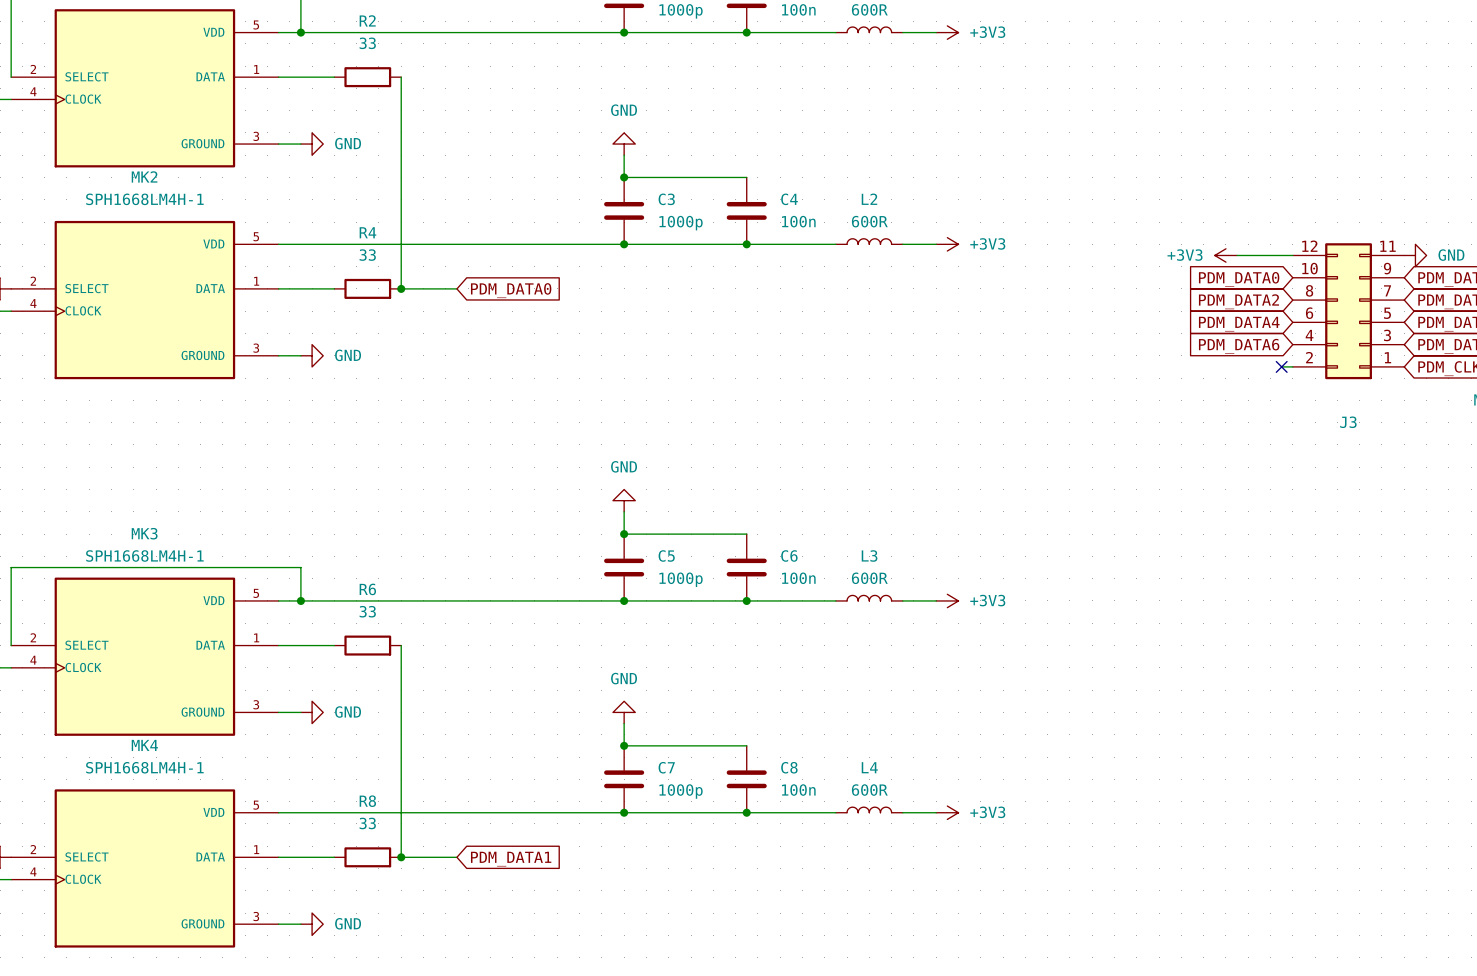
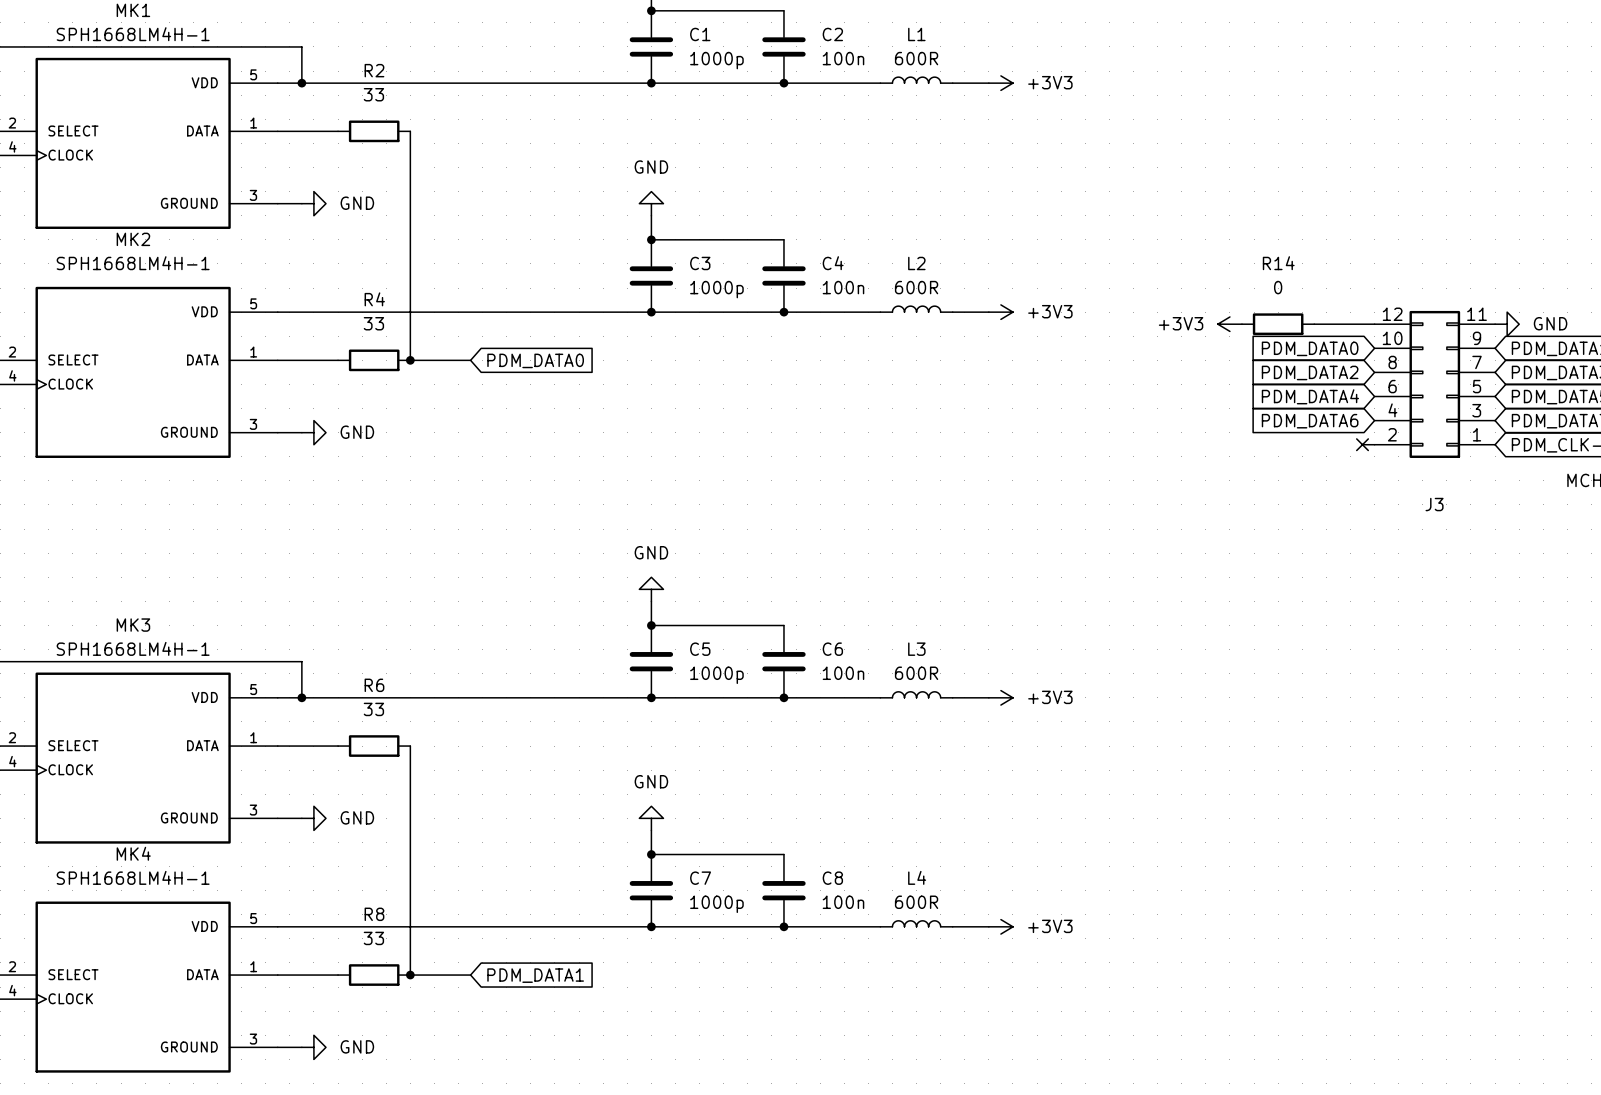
R14: none -> 0 (1278, 324)
power symbol position: +3V3 (1225, 255) -> +3V3 (1229, 324)

